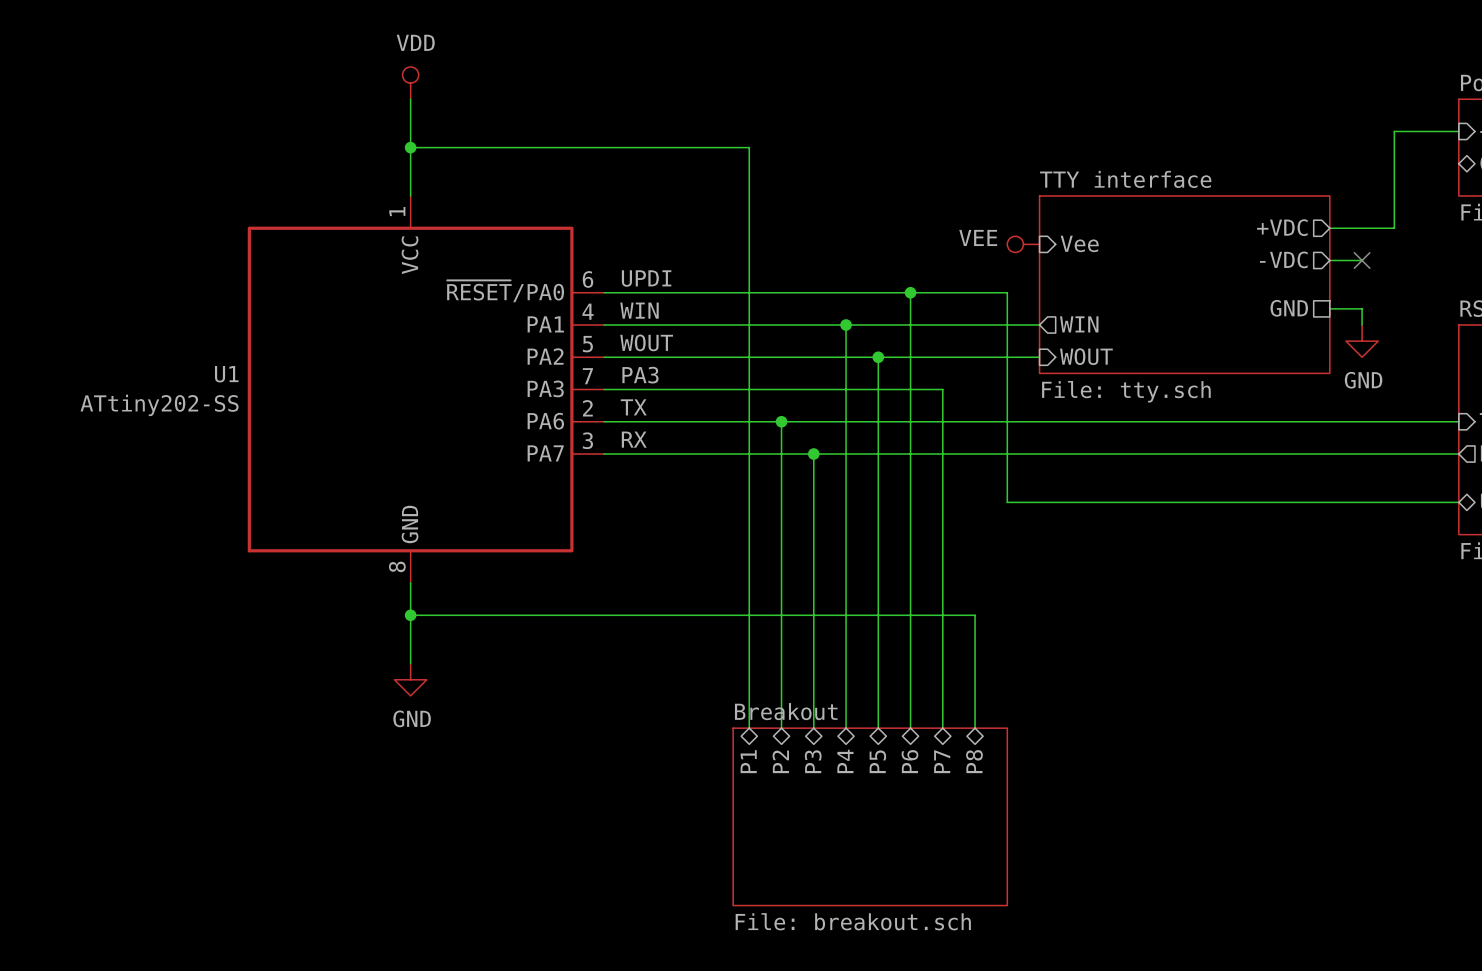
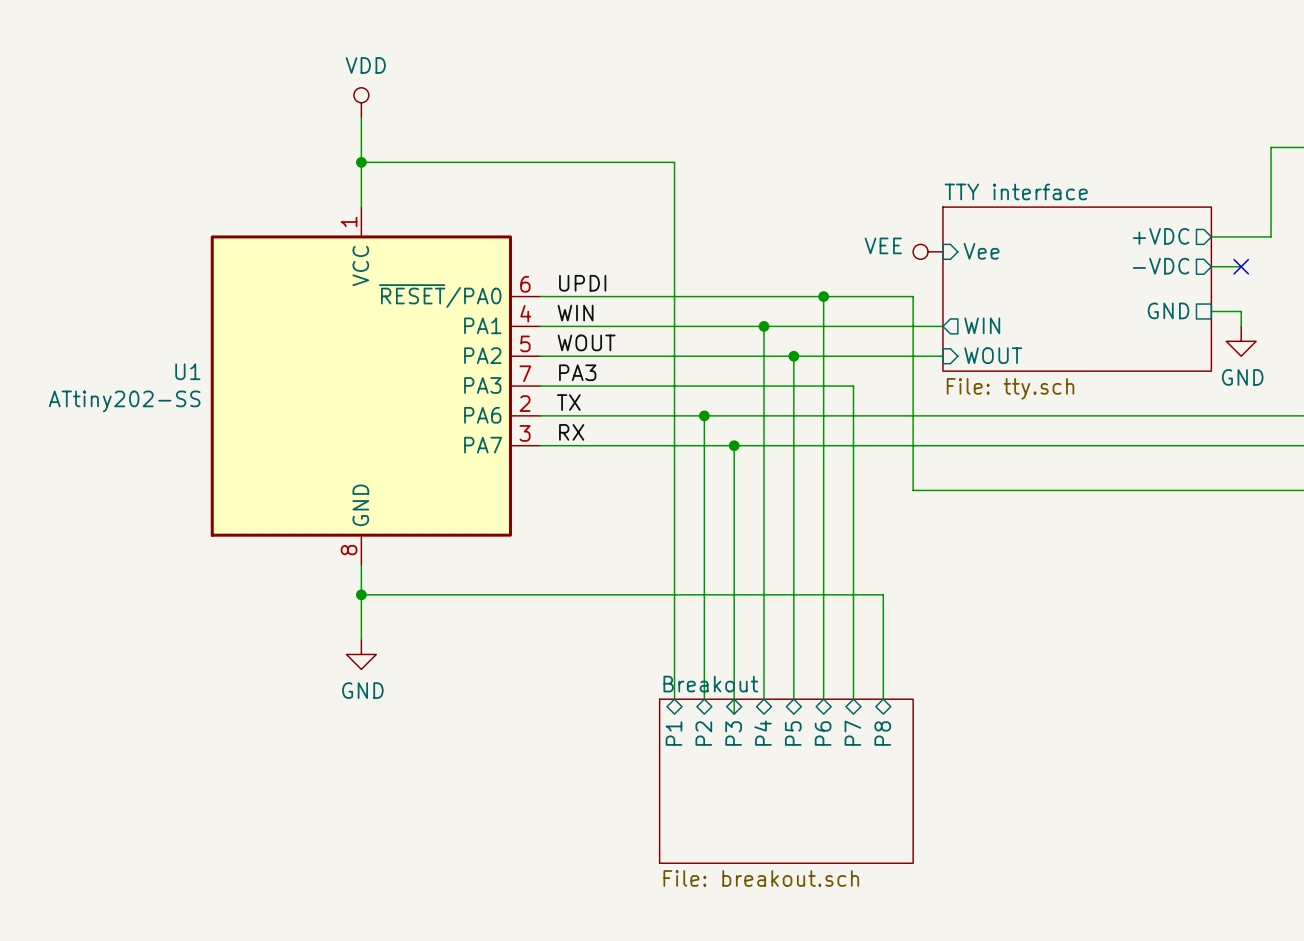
wire: none -> (734, 699) (734, 714)

